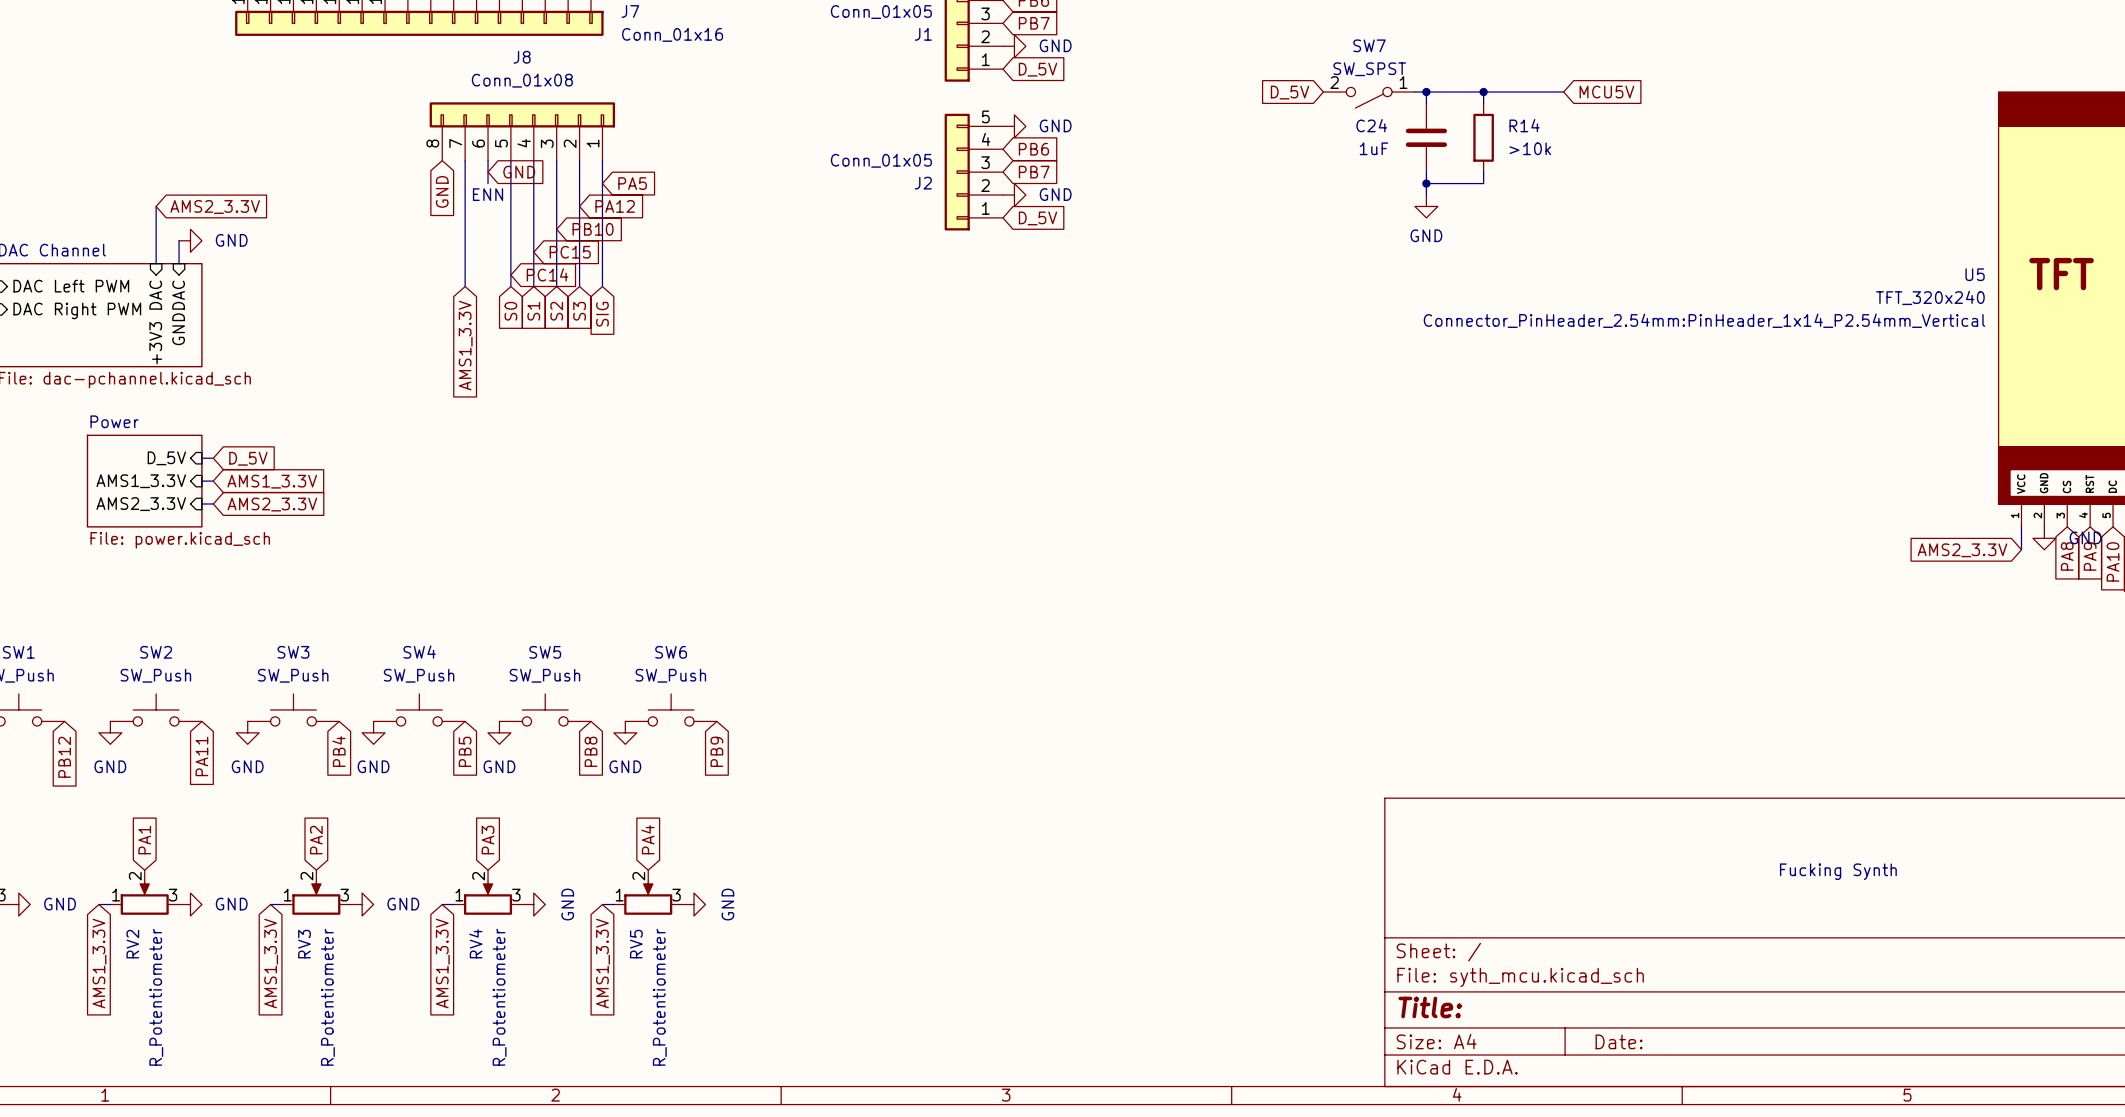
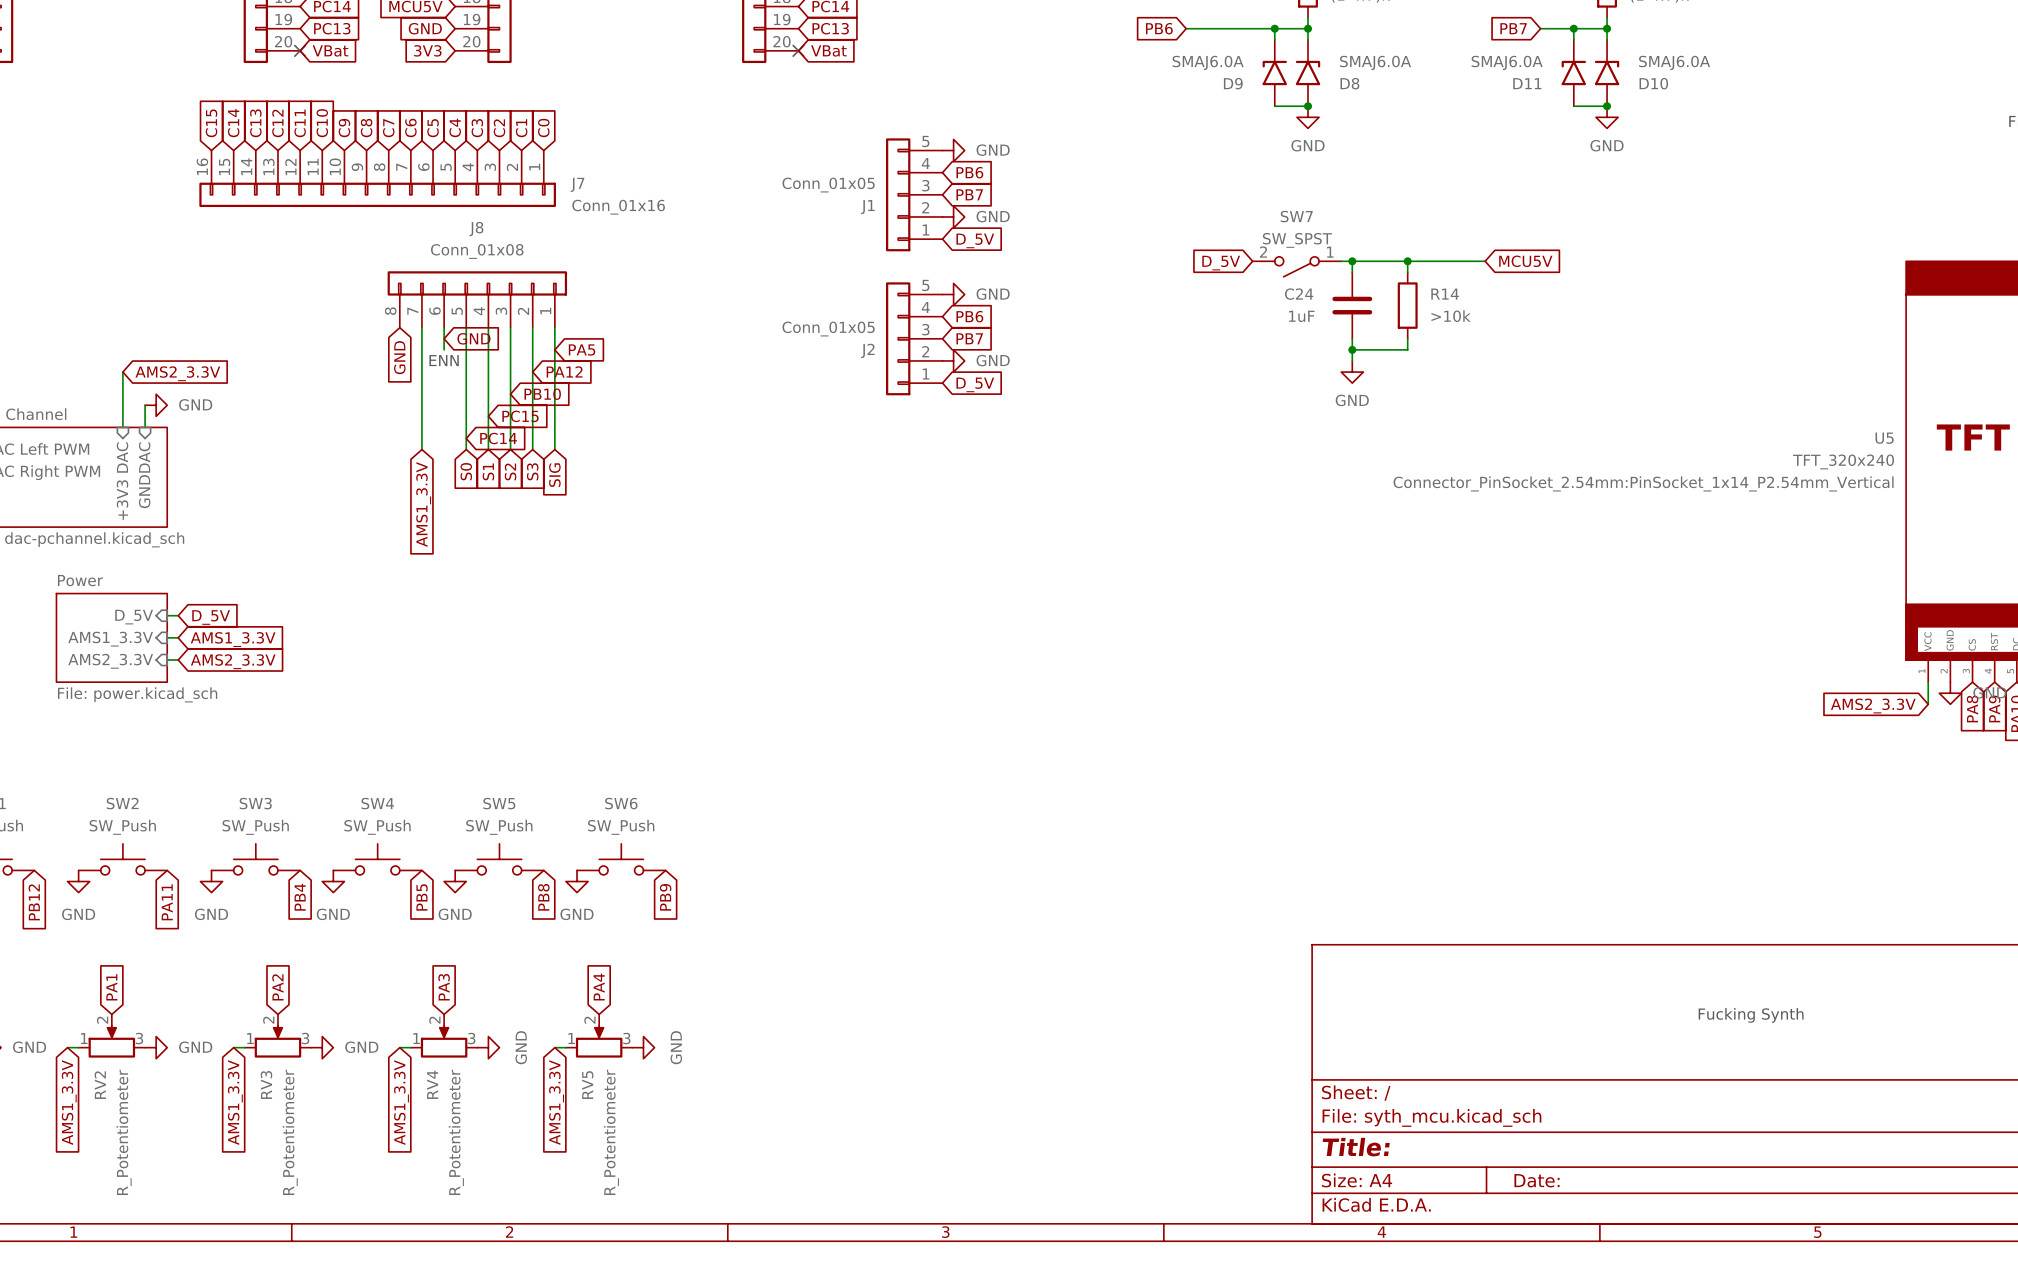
U5 text: Connector_PinHeader_2.54mm:PinHeader_1x14_P2.54mm_Vertical (1704, 320) -> Connector_PinSocket_2.54mm:PinSocket_1x14_P2.54mm_Vertical (1643, 483)

